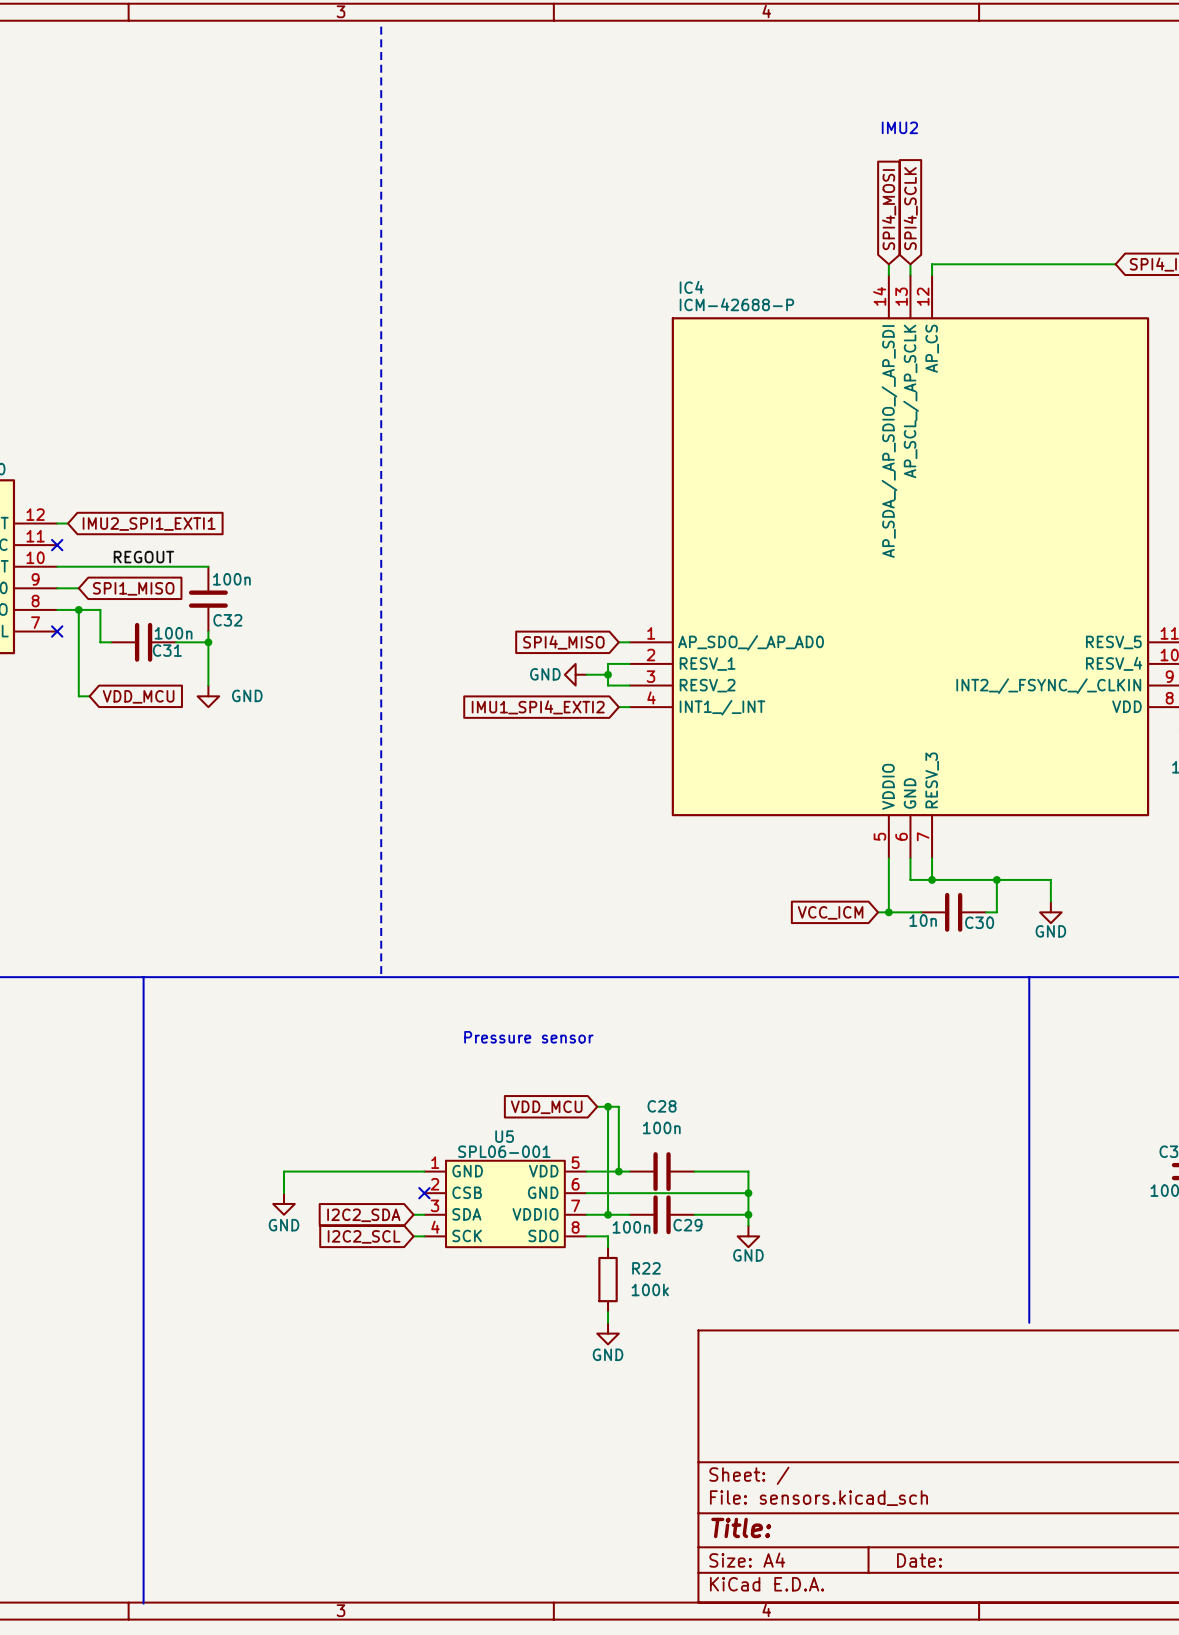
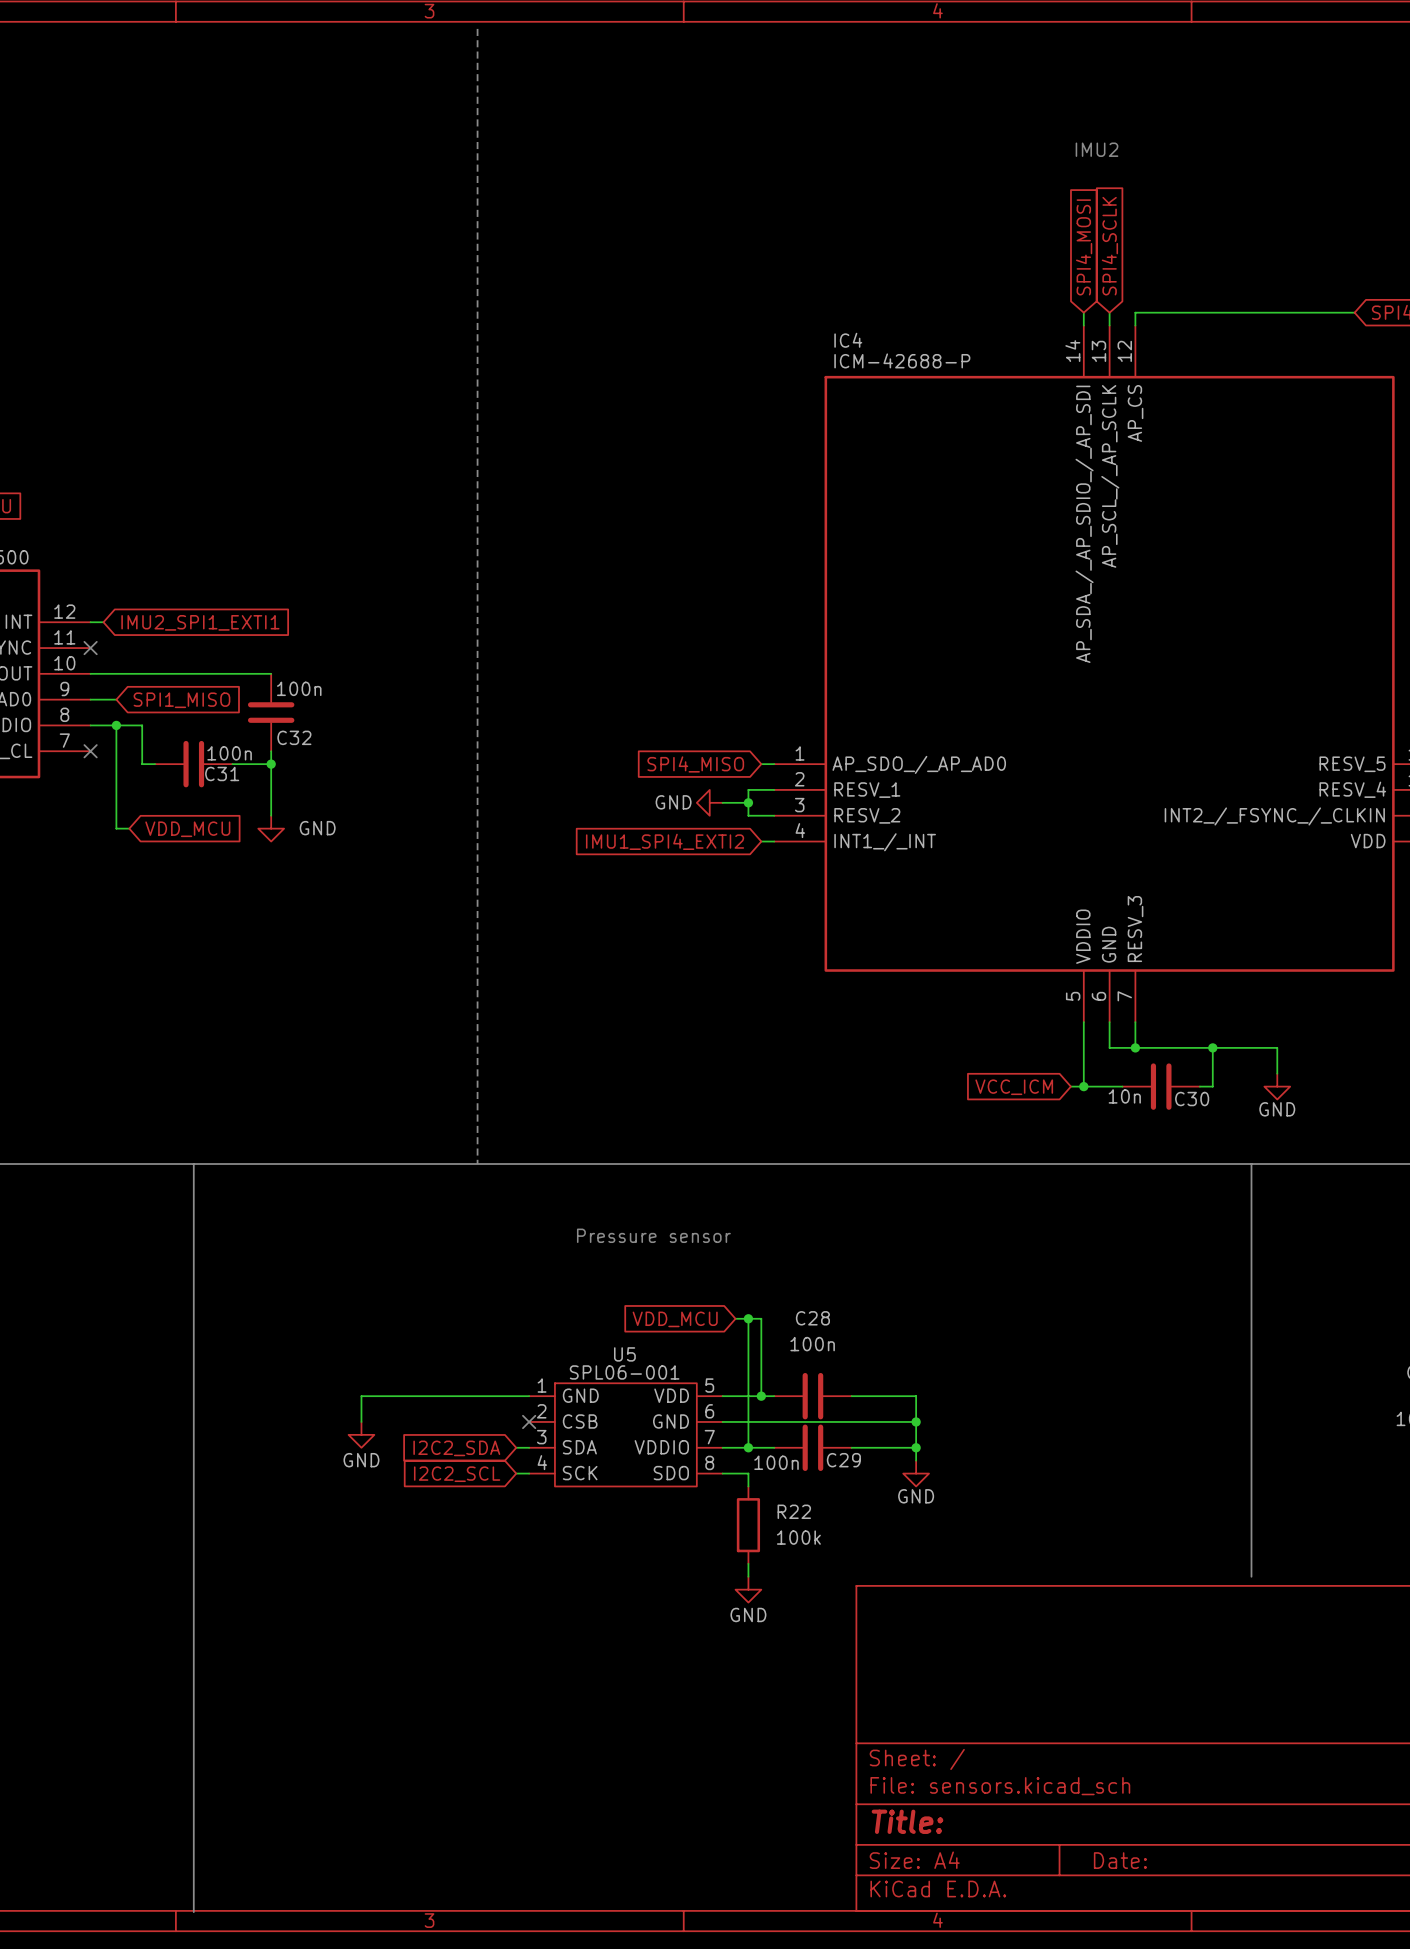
label: REGOUT (143, 557) -> none

